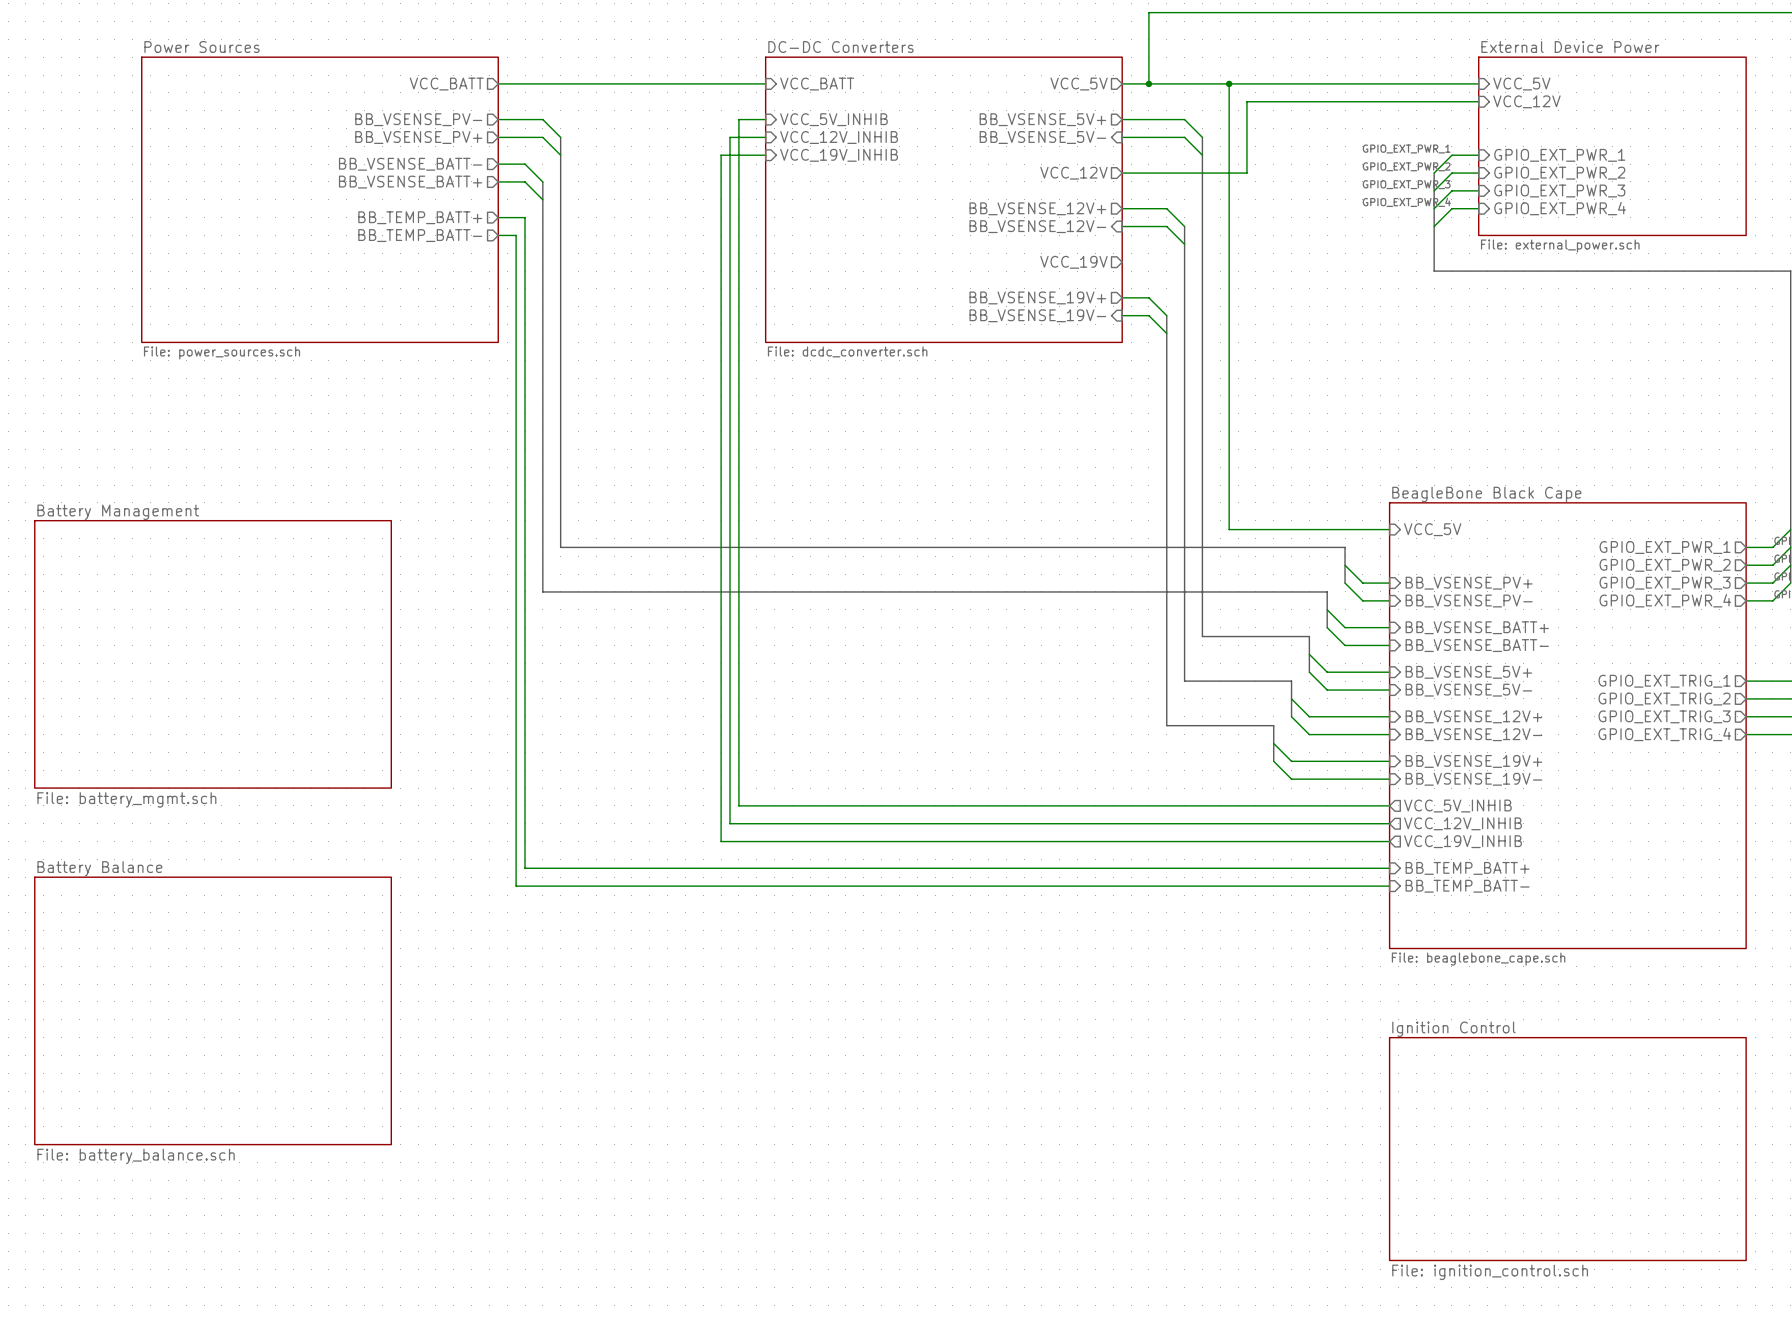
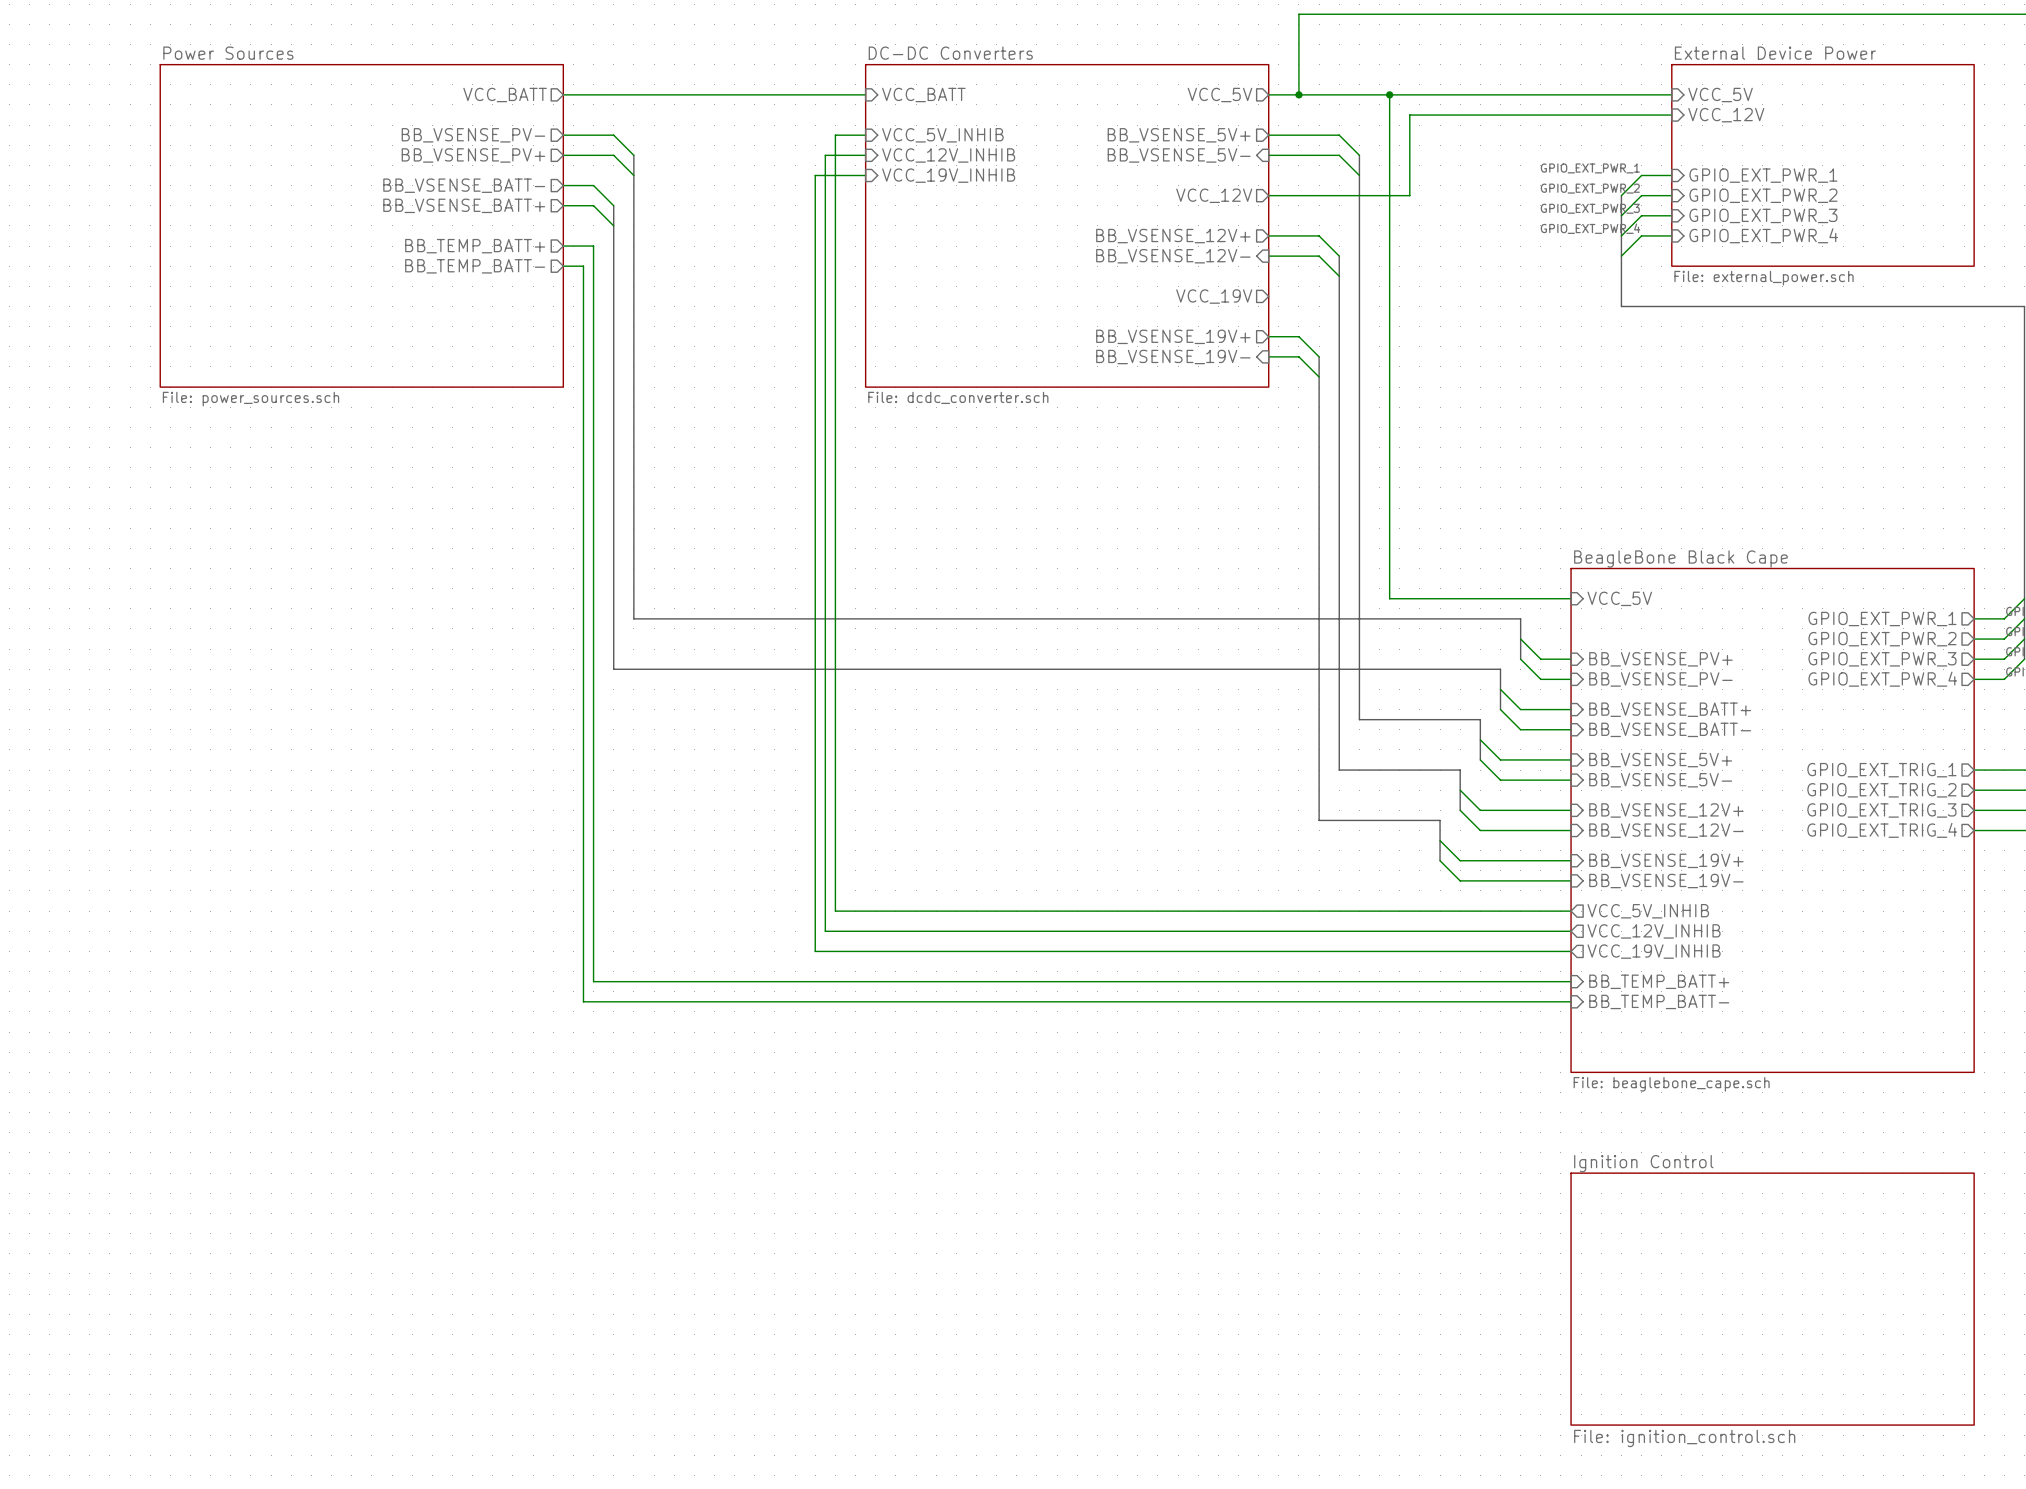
sheet Battery Management: File: battery_mgmt.sch (213, 654) -> none
sheet Battery Balance: File: battery_balance.sch (213, 1010) -> none

